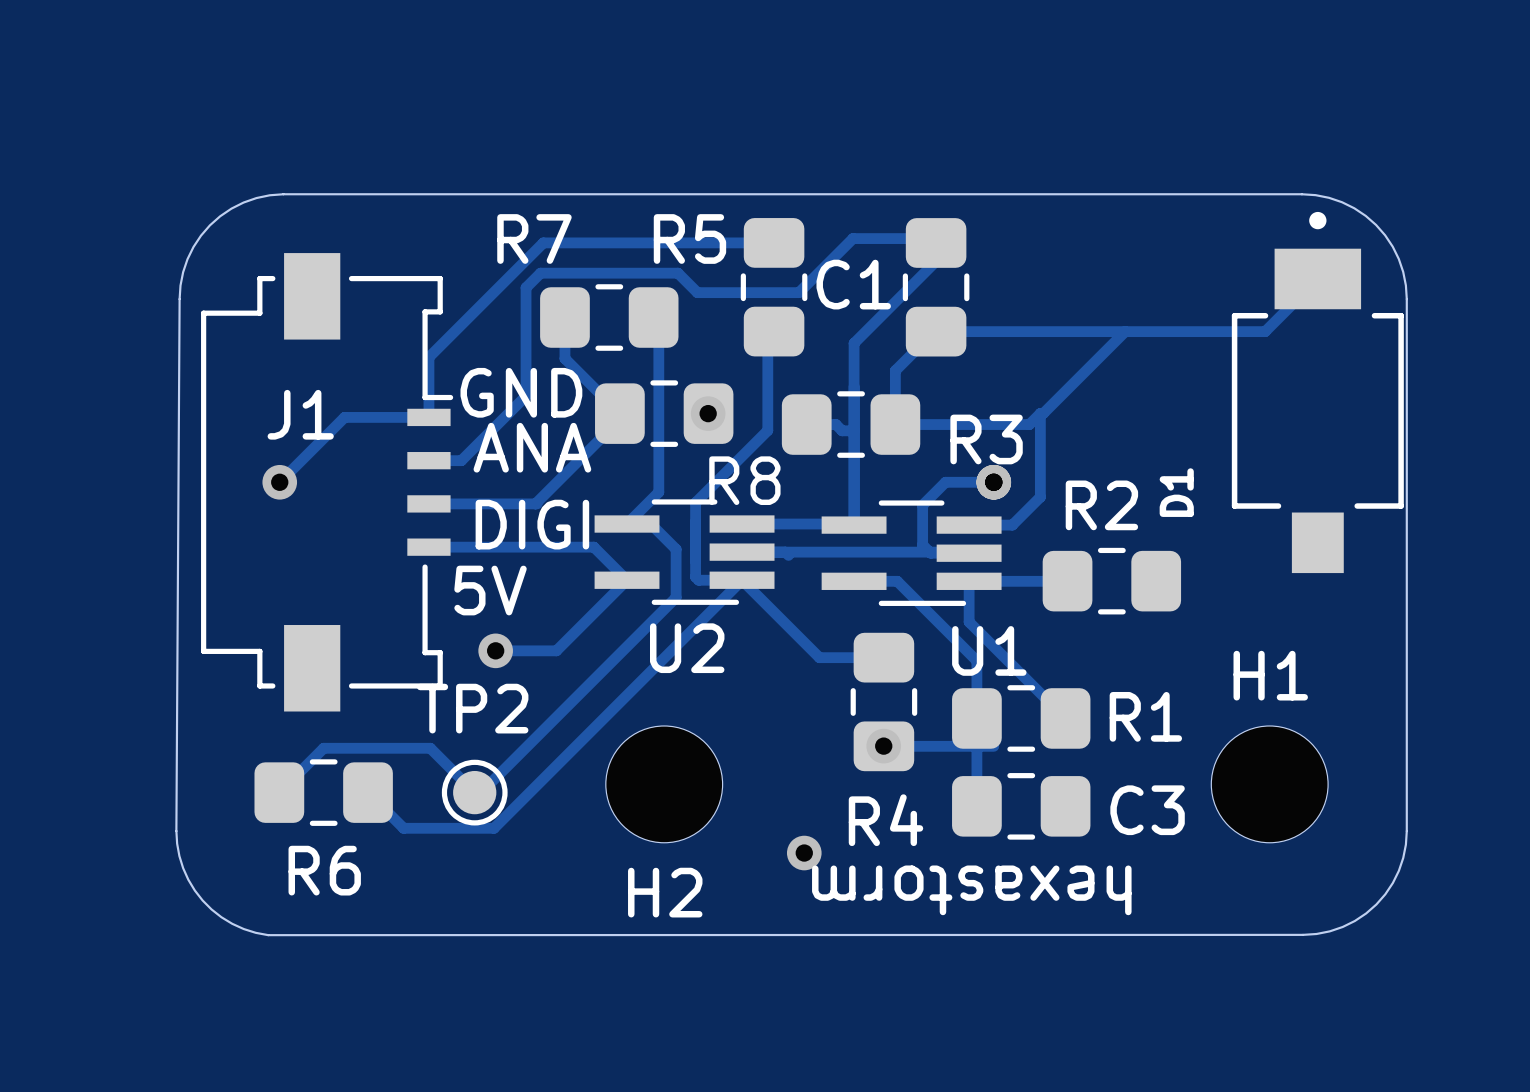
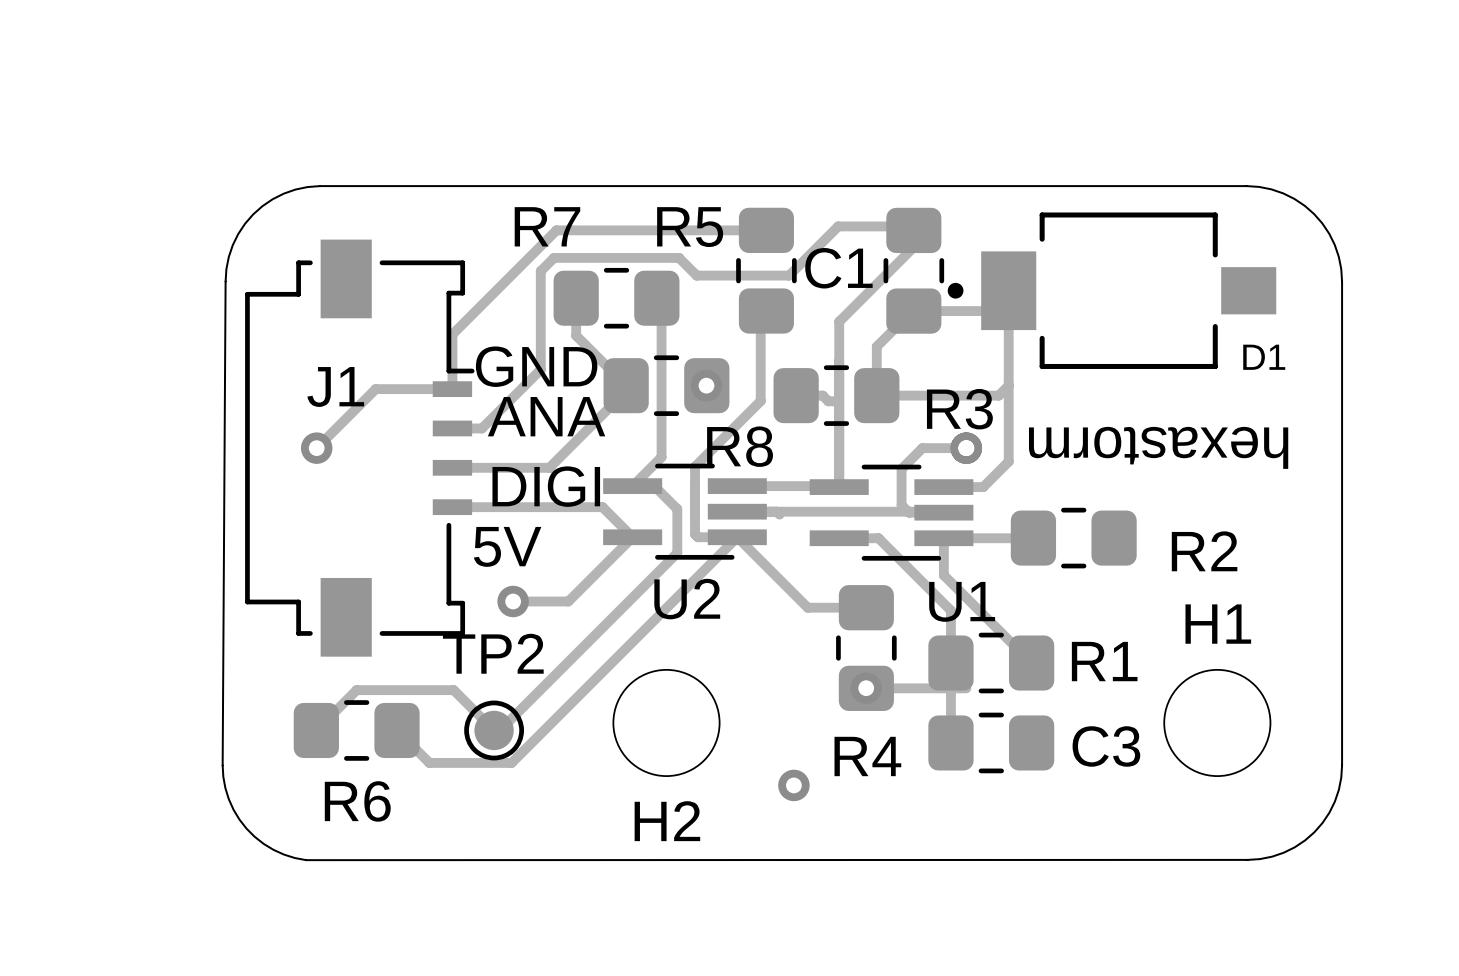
track: (1317, 278) (1265, 331) (1018, 331) -> none
track: (1125, 331) (1043, 413) (1040, 413) -> (988, 311) (1008, 290) (1008, 385)
D1 rotation: 0° (1317, 392) -> 90° counterclockwise (1111, 290)
D1 name position: D1 (1176, 492) -> D1 (1264, 357)
R2 name position: R2 (1101, 505) -> R2 (1204, 551)
text position: hexastorm (971, 890) -> hexastorm (1158, 447)

